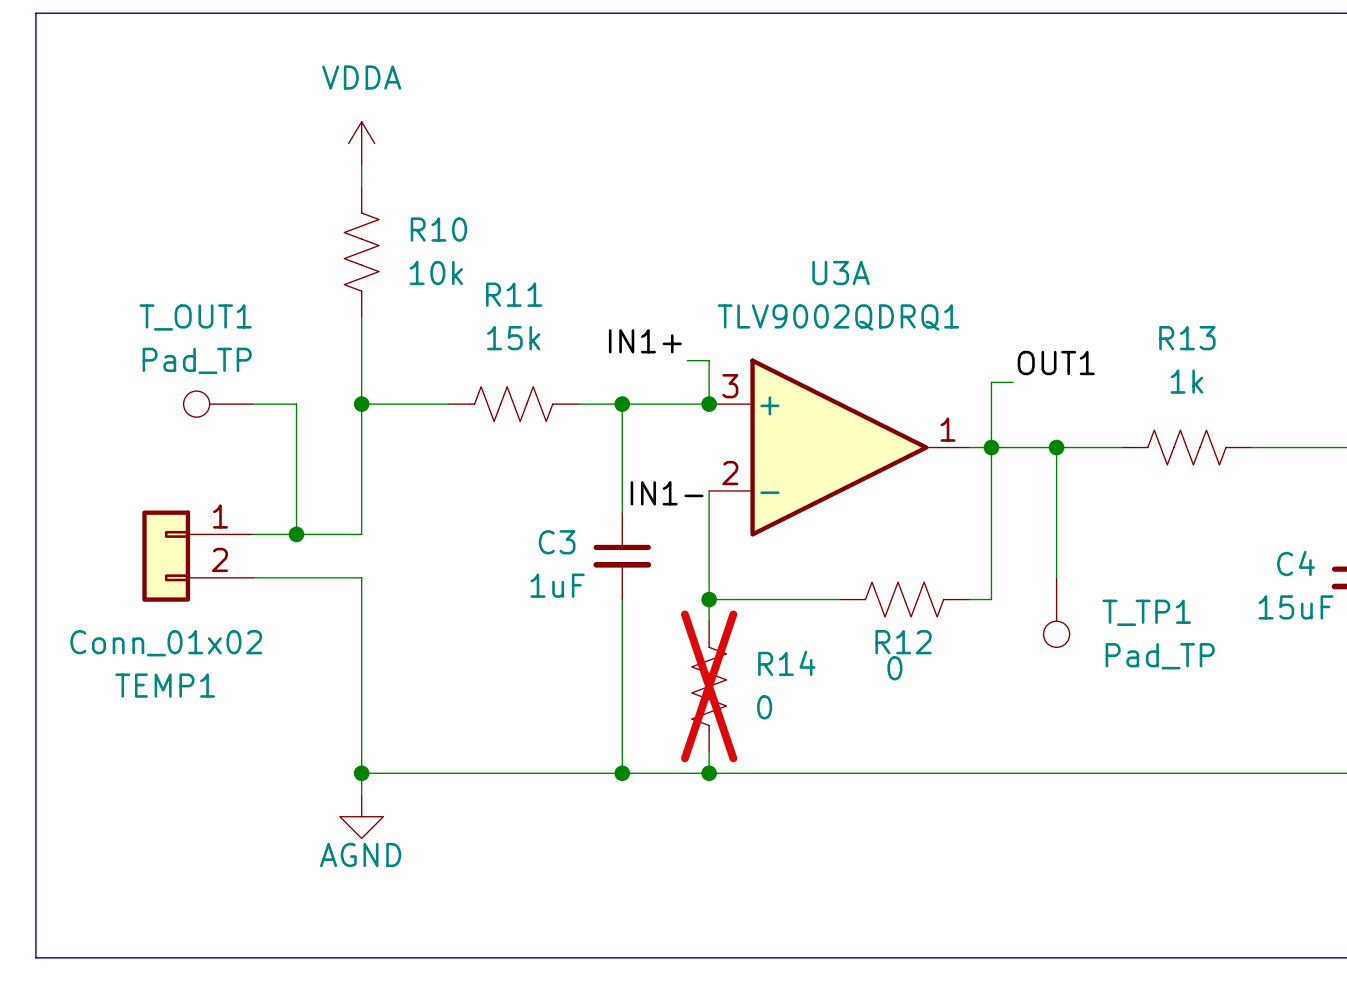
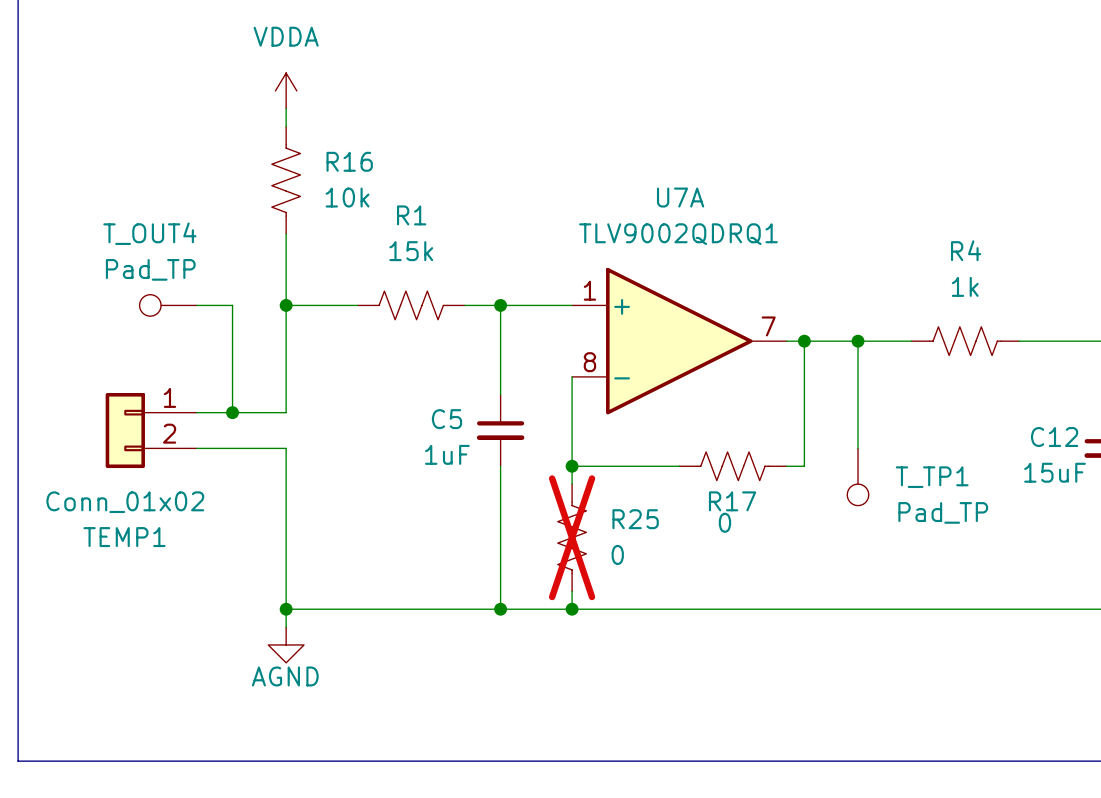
R10 name: R10 (438, 229) -> R16 (349, 161)
U3A name: U3A (840, 272) -> U7A (680, 197)
R11 name: R11 (514, 294) -> R1 (411, 215)
T_OUT1 name: T_OUT1 (195, 317) -> T_OUT4 (149, 233)
R13 name: R13 (1187, 338) -> R4 (966, 250)
label: IN1+ (645, 341) -> none
wire: (687, 360) (709, 360) (709, 404) -> none
label: OUT1 (1056, 363) -> none
wire: (1013, 382) (991, 382) (991, 447) -> none
U3A pin number: 3 (730, 386) -> 1 (589, 290)
junction: (709, 404) -> none
U3A pin number: 1 (948, 429) -> 7 (768, 326)
U3A pin number: 2 (730, 473) -> 8 (589, 362)
label: IN1- (667, 493) -> none
C3 name: C3 (557, 542) -> C5 (446, 419)
C4 name: C4 (1295, 563) -> C12 (1054, 437)
R12 name: R12 (903, 642) -> R17 (732, 501)
R14 name: R14 (786, 663) -> R25 (635, 519)

